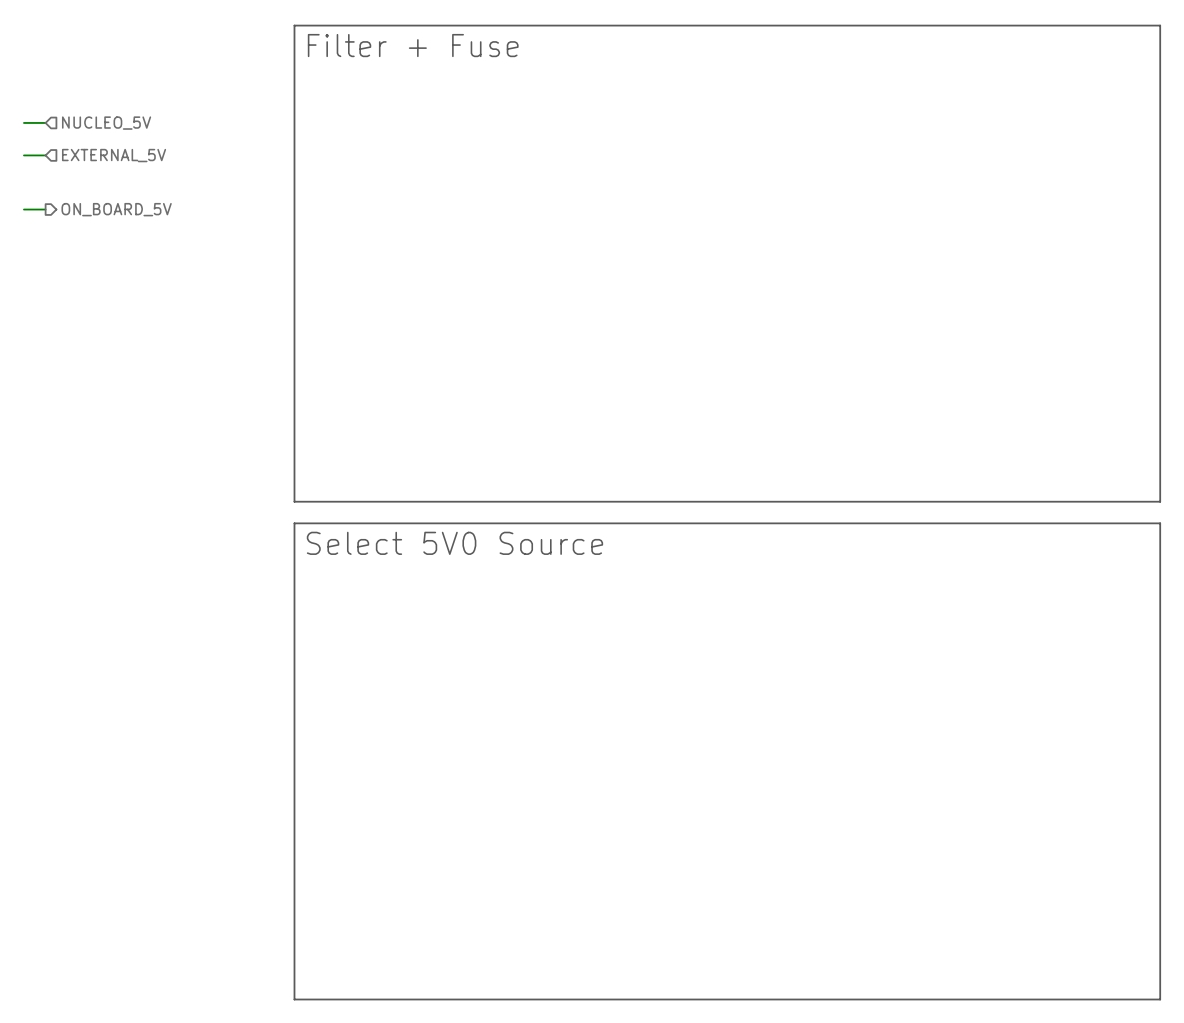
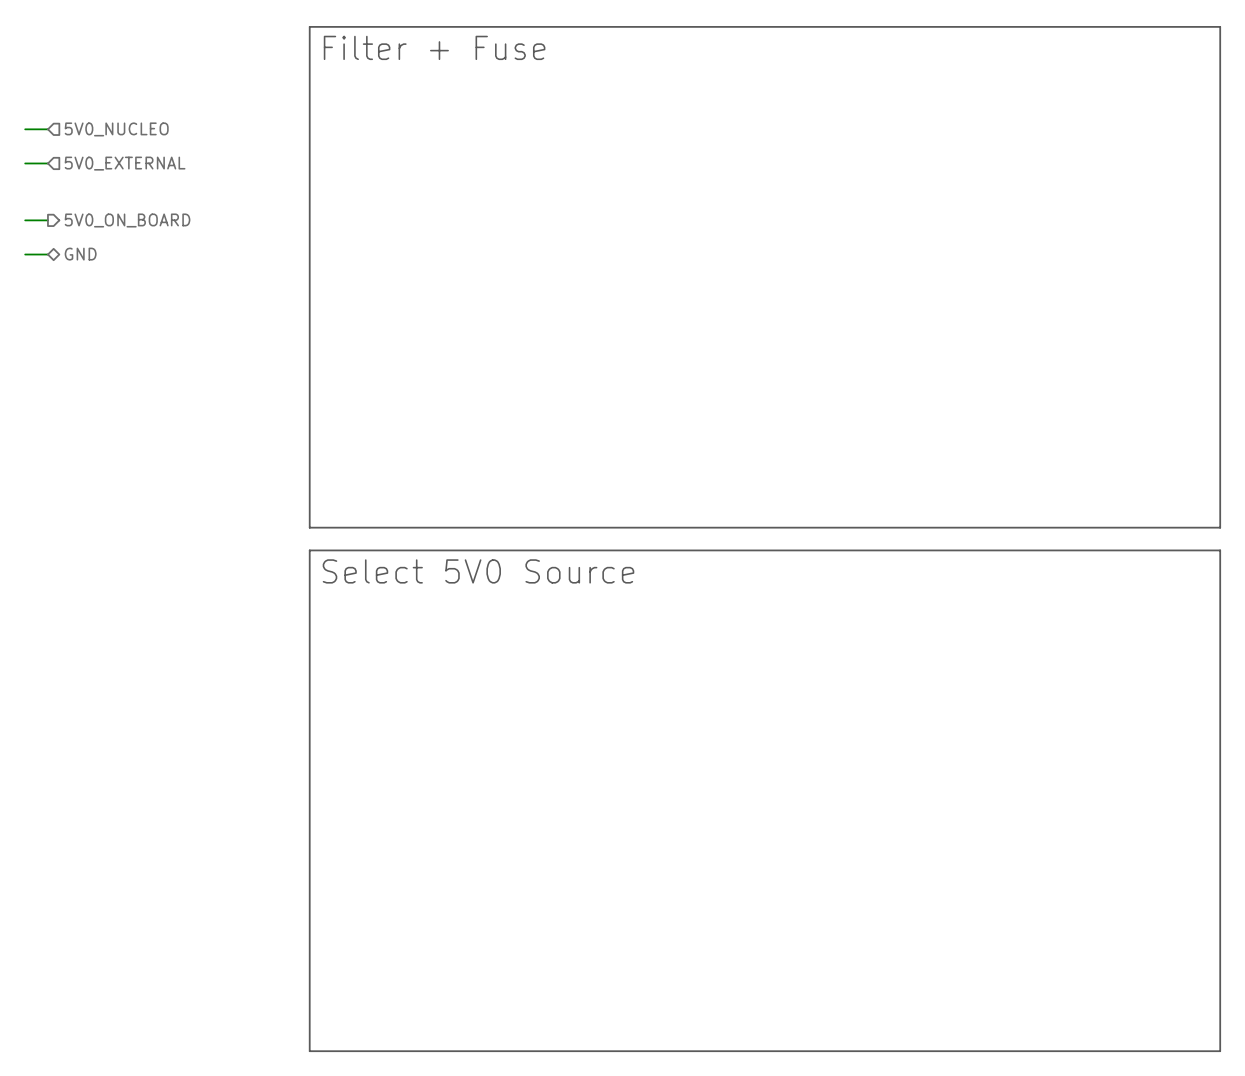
hierarchical label: NUCLEO_5V (106, 123) -> 5V0_NUCLEO (116, 129)
hierarchical label: EXTERNAL_5V (114, 155) -> 5V0_EXTERNAL (125, 163)
hierarchical label: ON_BOARD_5V (116, 209) -> 5V0_ON_BOARD (127, 220)
hierarchical label: none -> GND (80, 254)
wire: none -> (25, 254) (47, 254)

